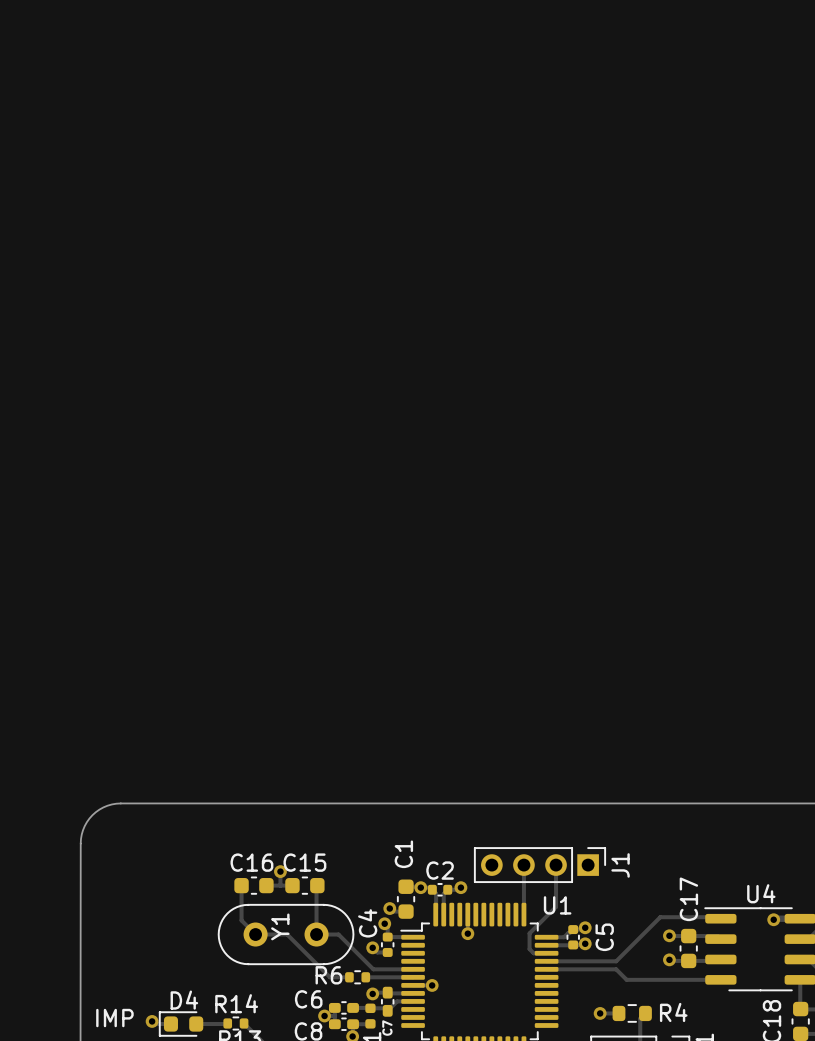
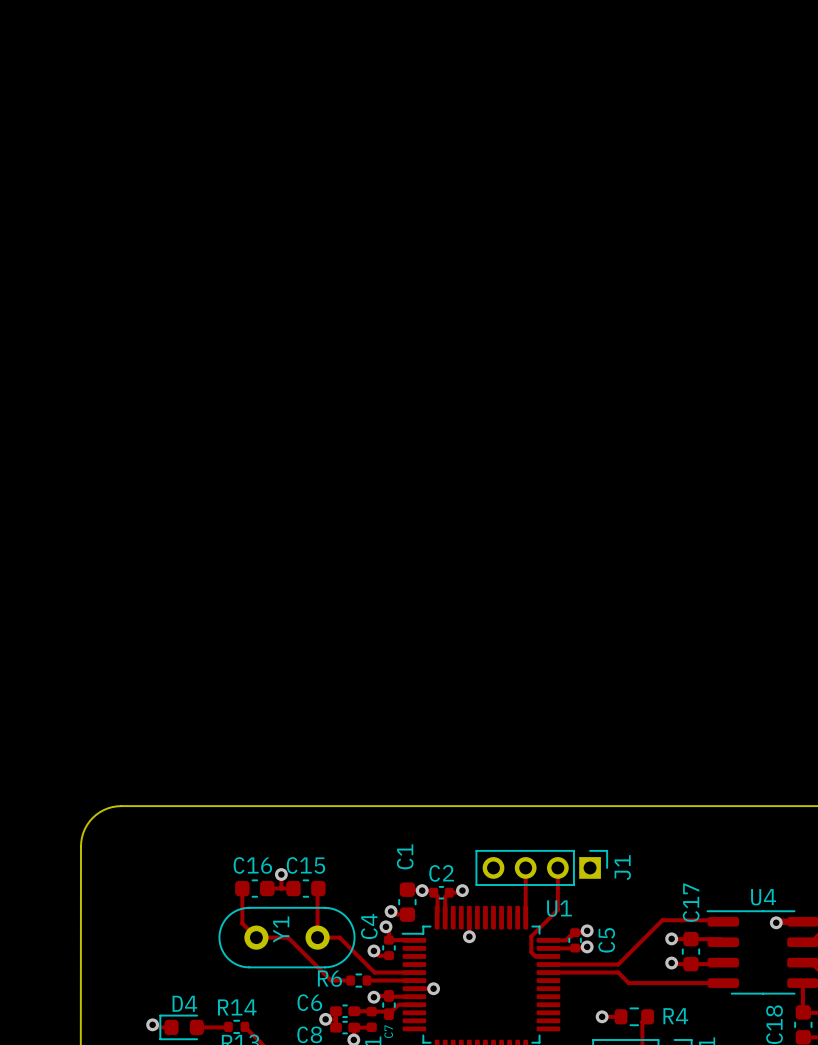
text: IMP (114, 1018) -> none

